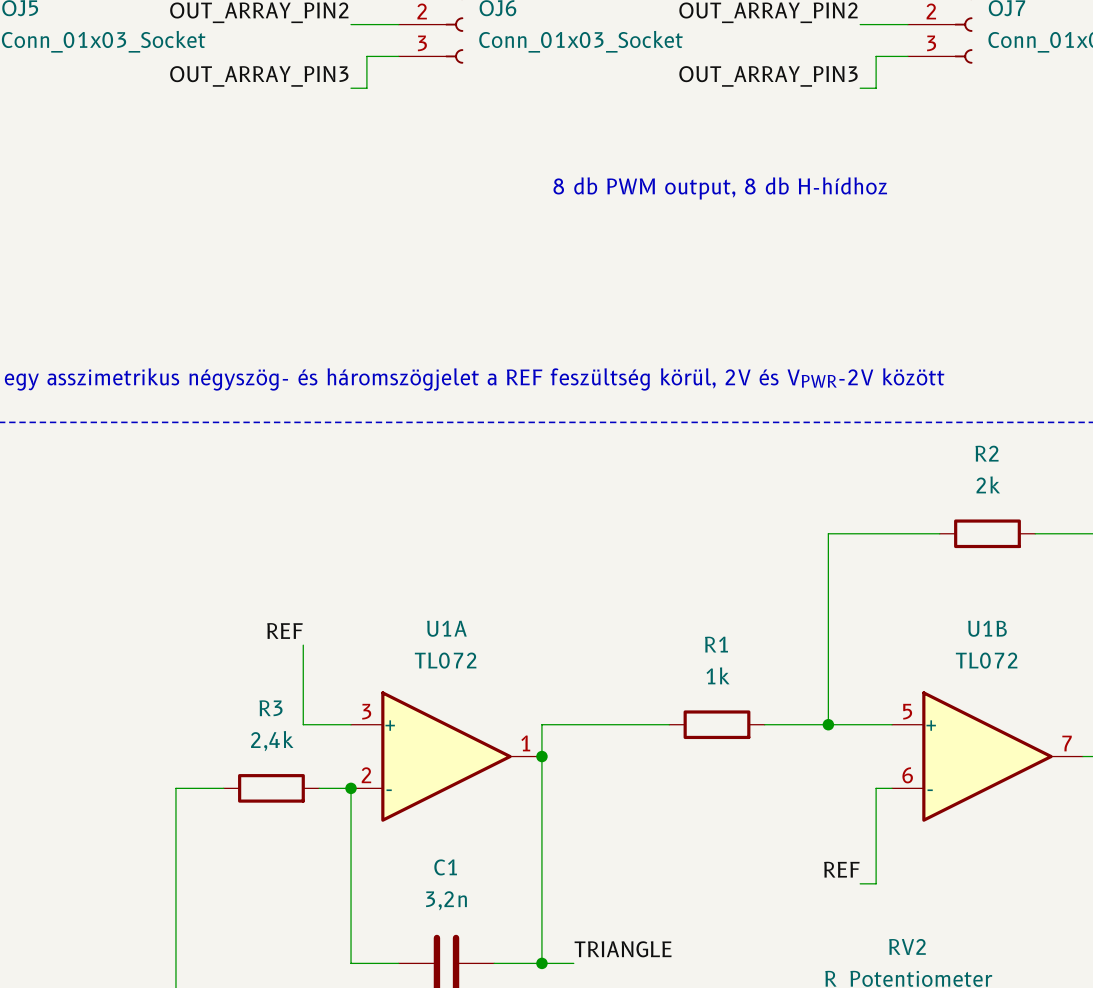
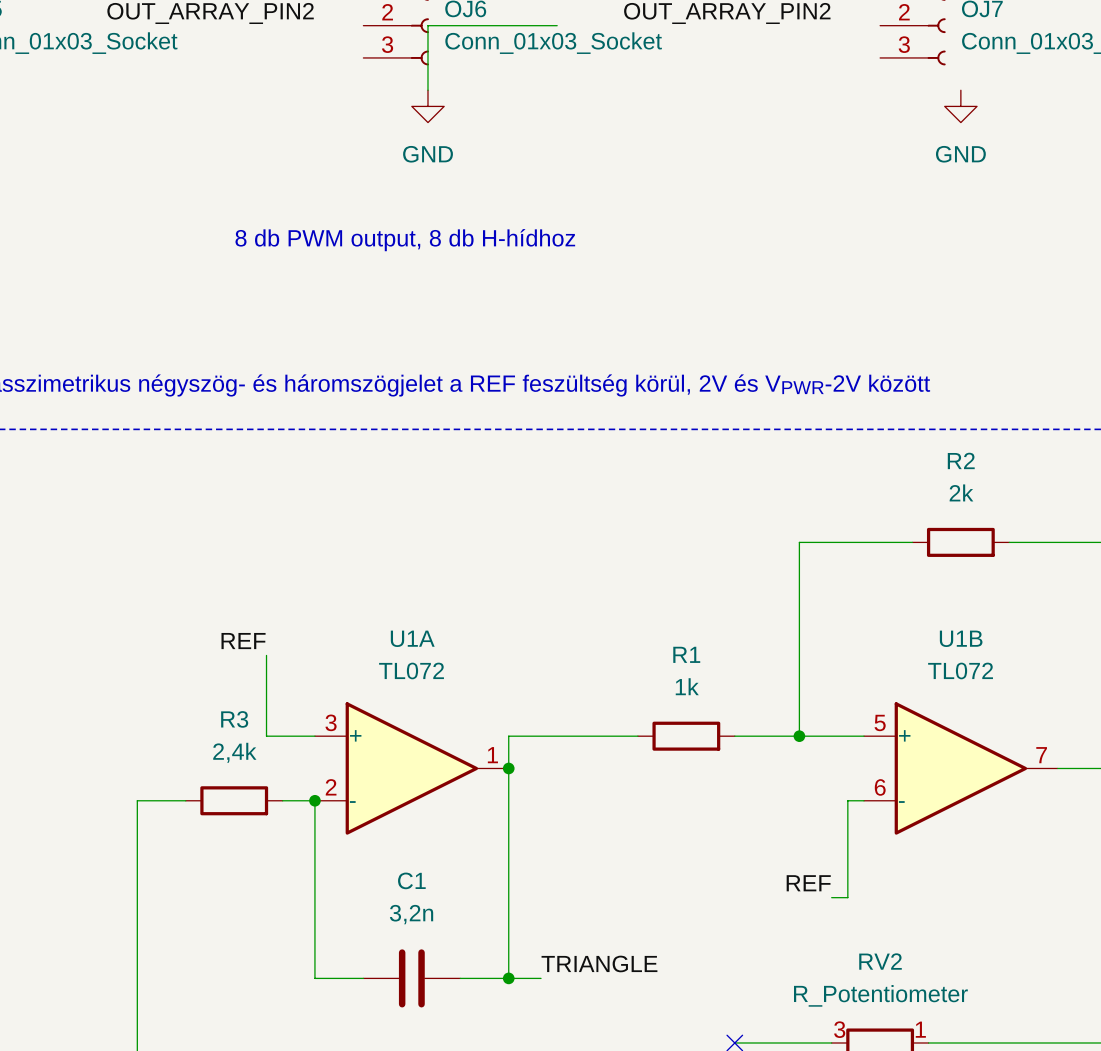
wire: (351, 24) (398, 24) -> none
wire: none -> (557, 25) (427, 25) (427, 90)
wire: (860, 24) (907, 24) -> none
wire: (398, 56) (366, 56) (366, 88) (351, 88) -> none
wire: (907, 56) (876, 56) (876, 88) (860, 88) -> none
label: OUT_ARRAY_PIN3 (259, 76) -> none
label: OUT_ARRAY_PIN3 (768, 76) -> none
power symbol: none -> GND (427, 106)
power symbol: none -> GND (960, 106)
text position: 8 db PWM output, 8 db H-hídhoz (720, 188) -> 8 db PWM output, 8 db H-hídhoz (405, 240)

